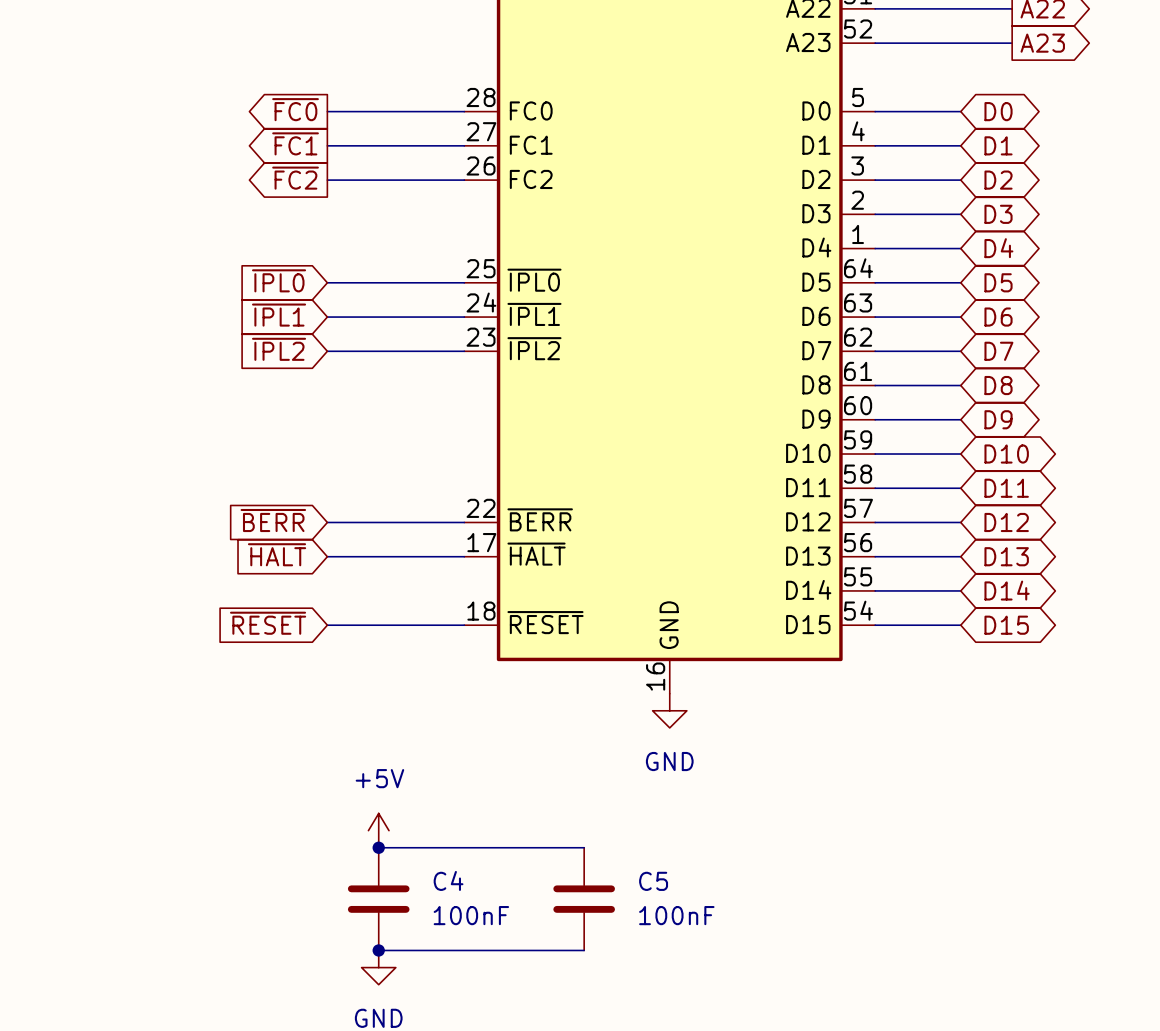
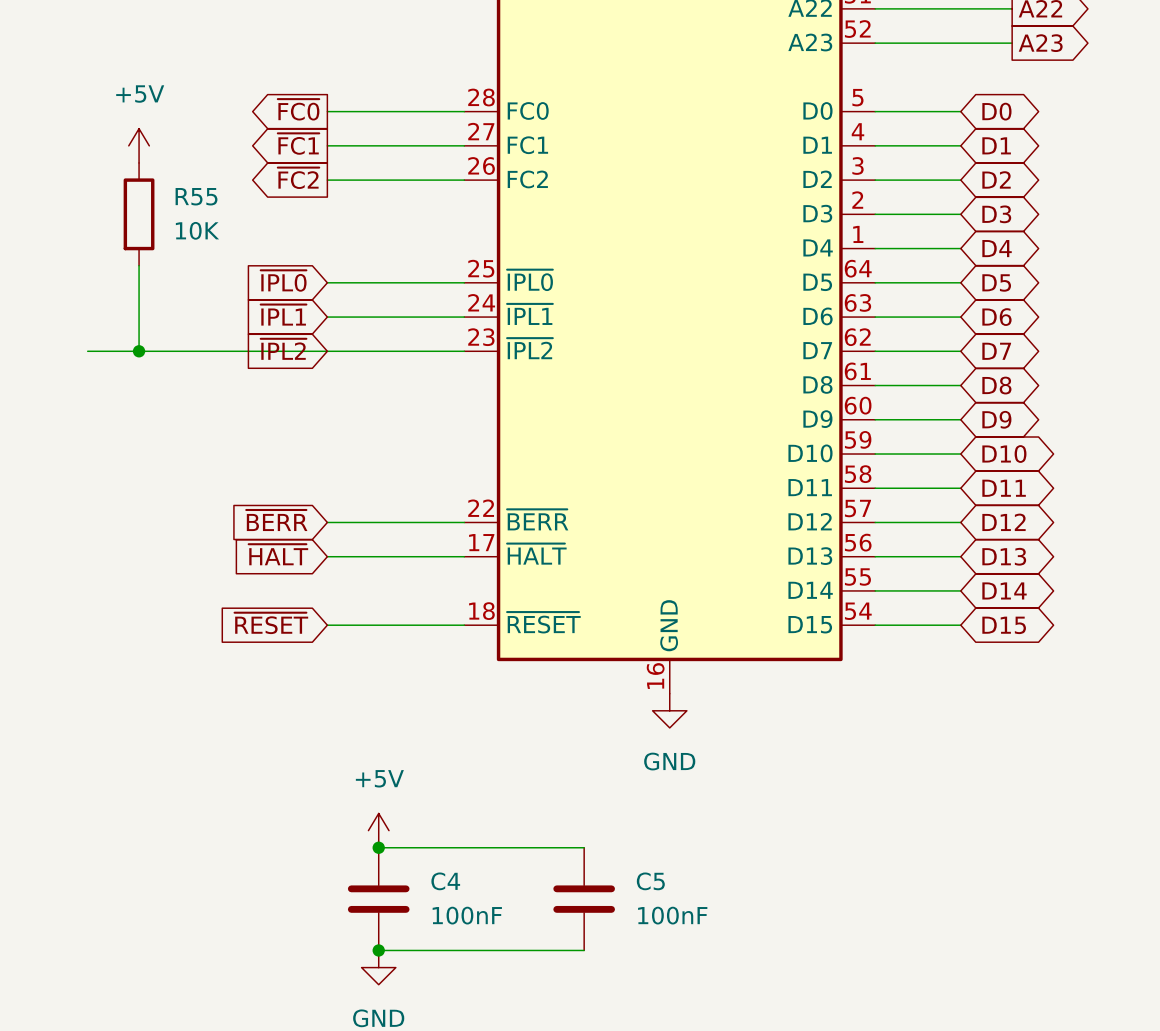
power symbol: none -> +5V (139, 145)
R55: none -> 10K (139, 214)
wire: none -> (139, 265) (139, 351)
wire: none -> (87, 351) (327, 351)
junction: none -> (139, 351)

